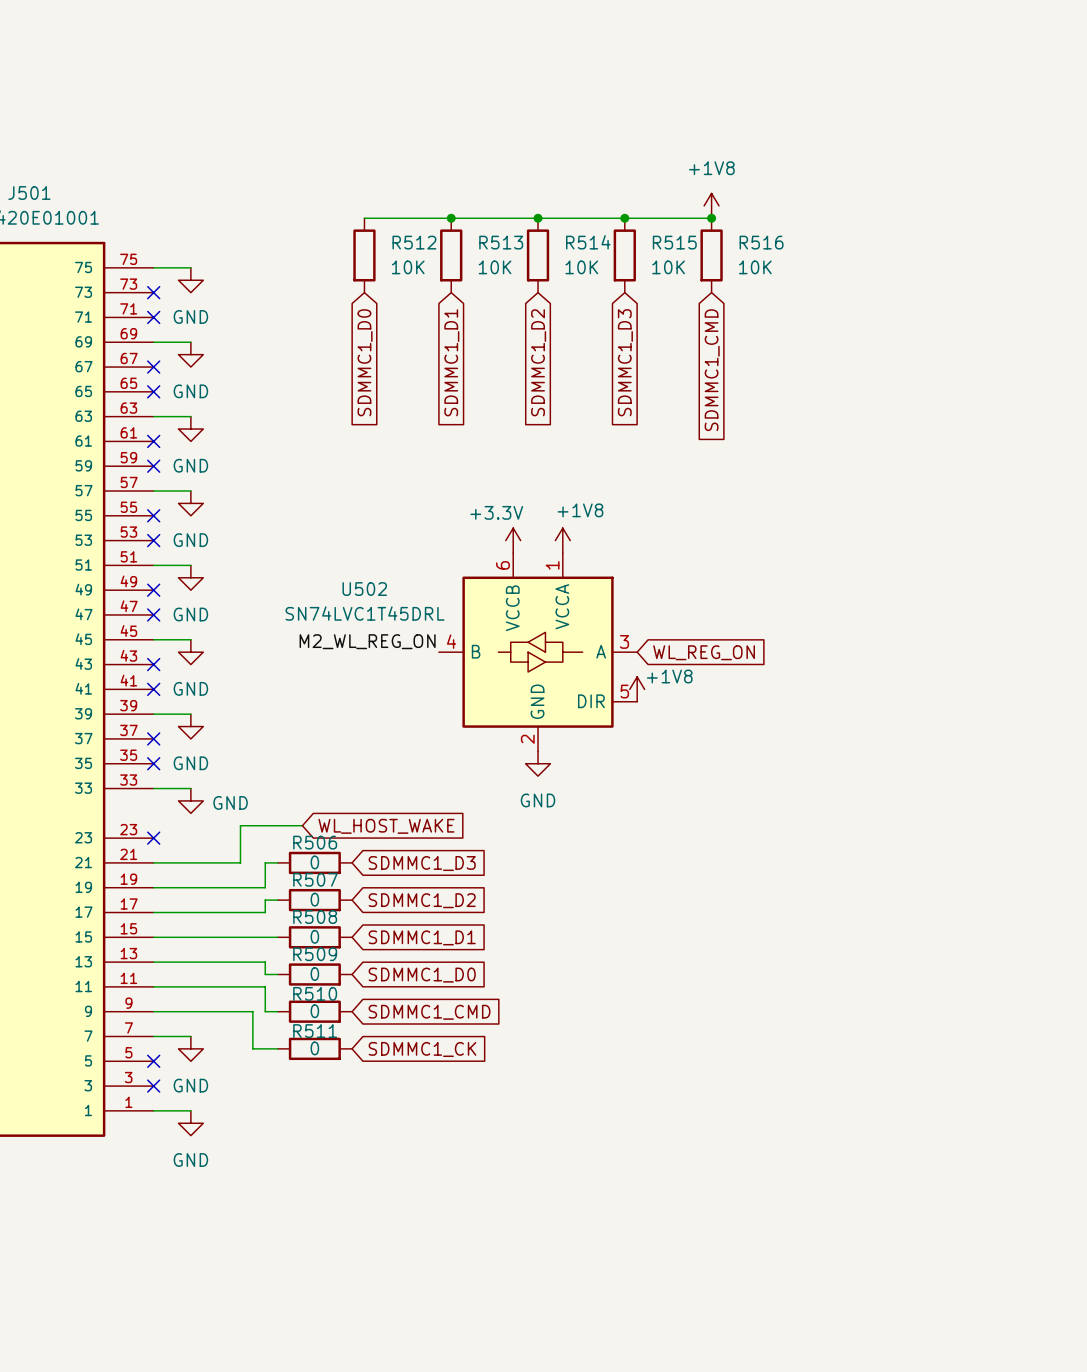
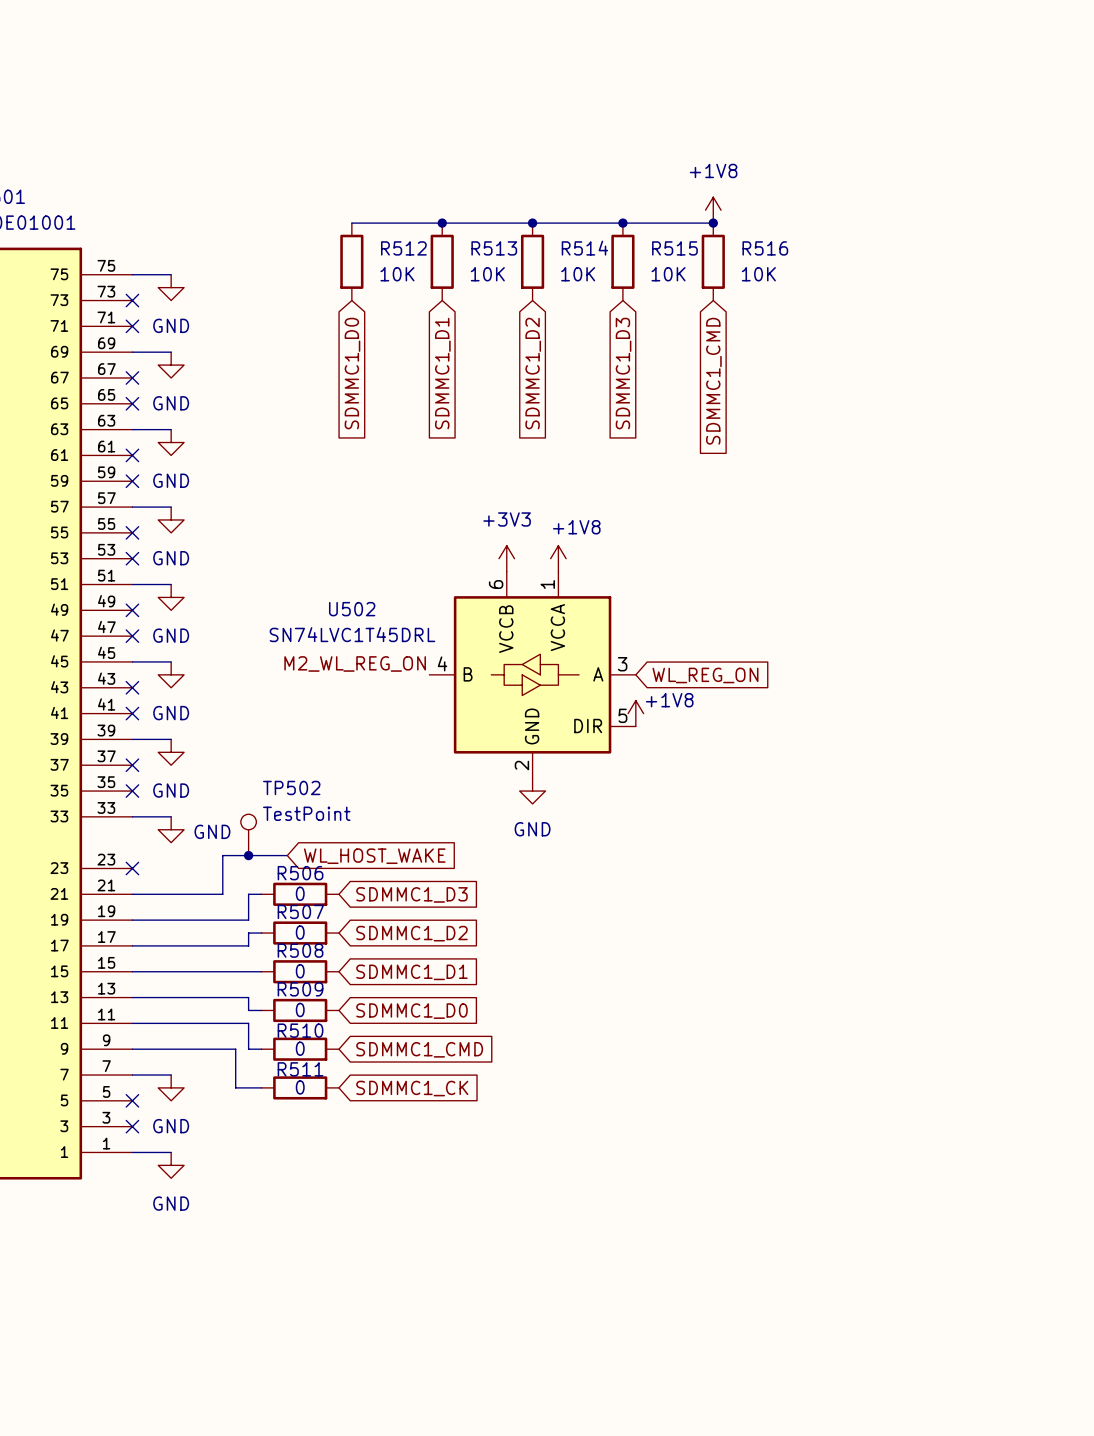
power symbol: +3.3V (513, 540) -> +3V3 (506, 558)
TP502: none -> TestPoint (248, 834)
junction: none -> (248, 855)

